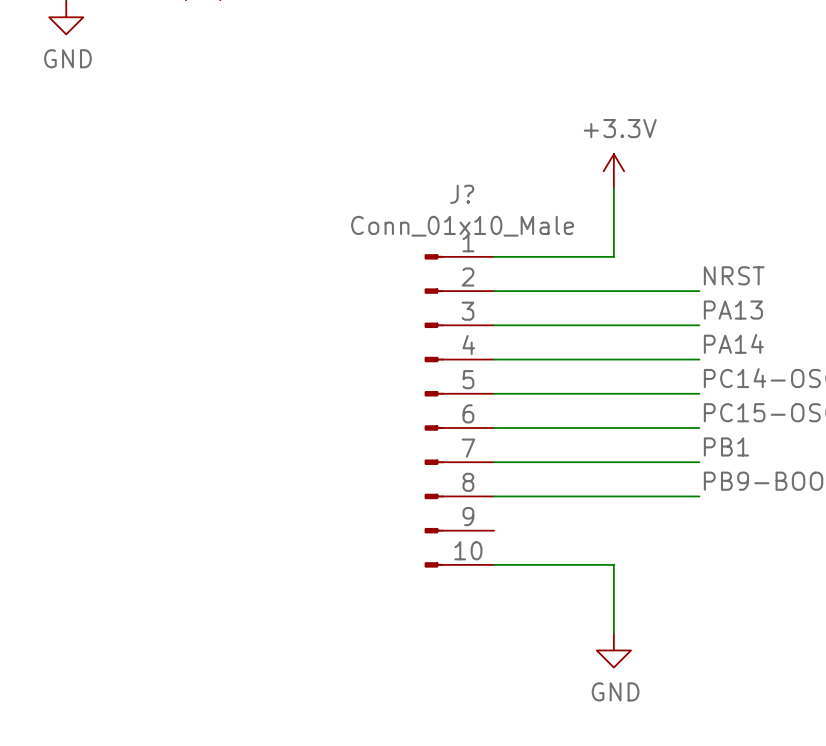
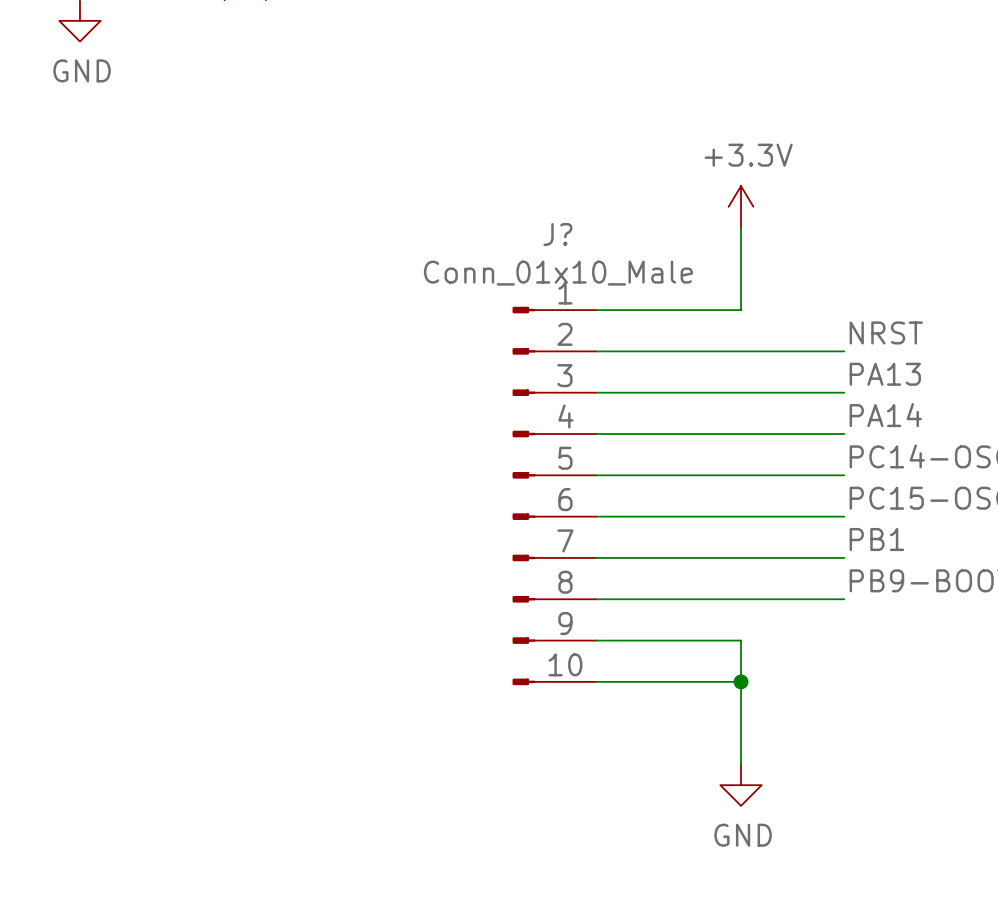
wire: none -> (596, 640) (741, 640) (741, 681)
junction: none -> (741, 681)

